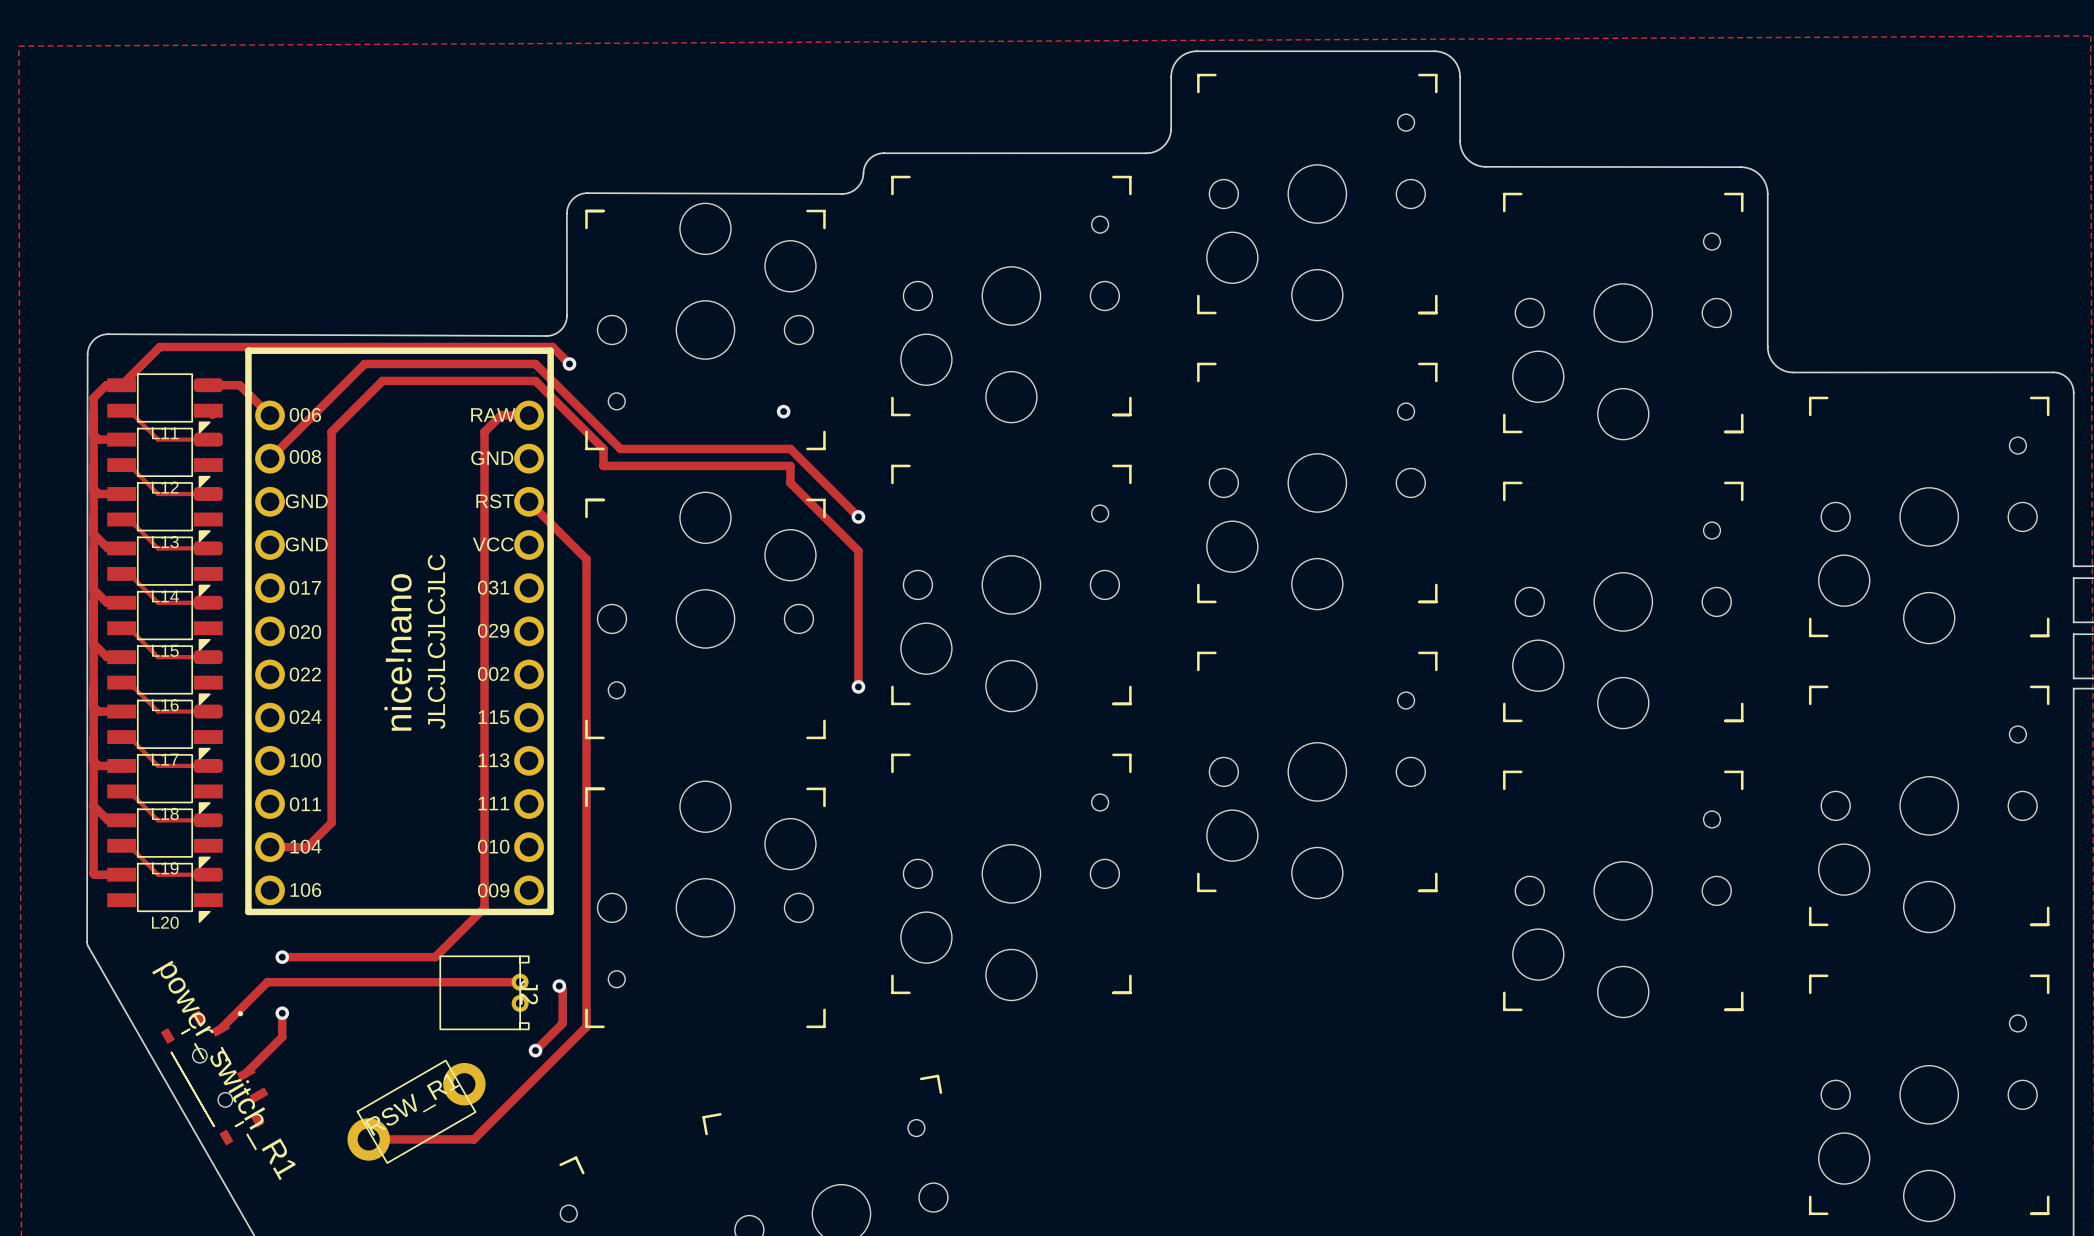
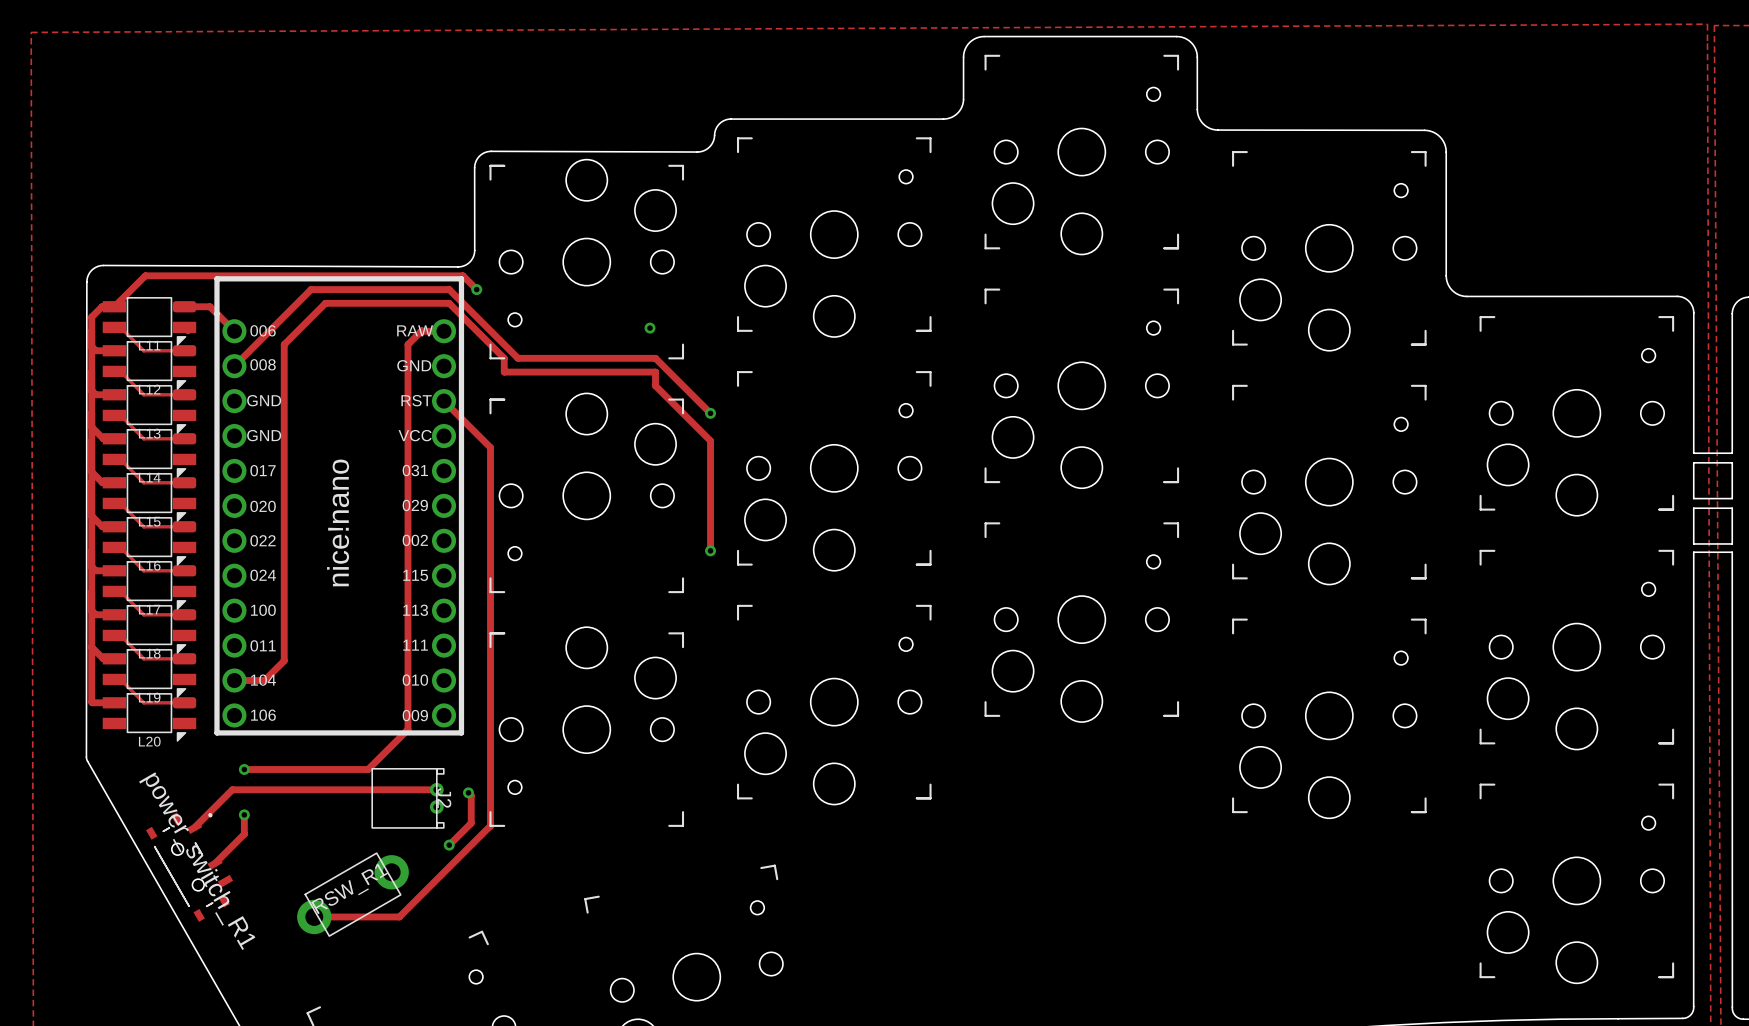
text: JLCJLCJLCJLC (436, 641) -> none

